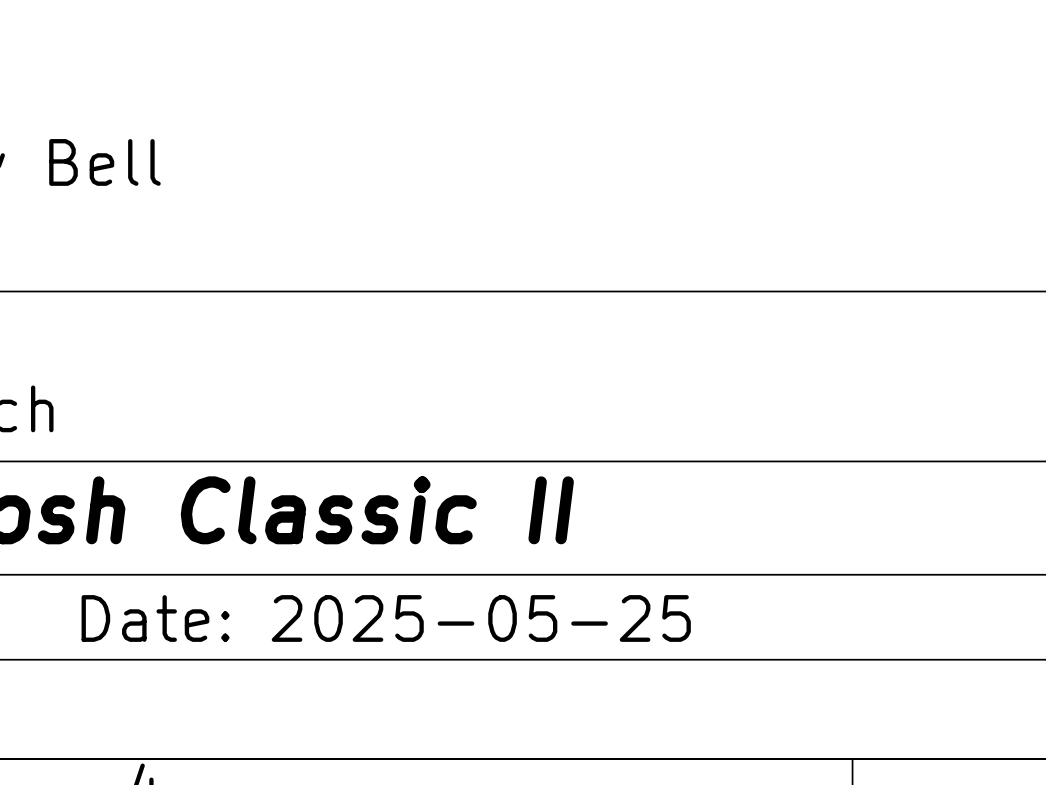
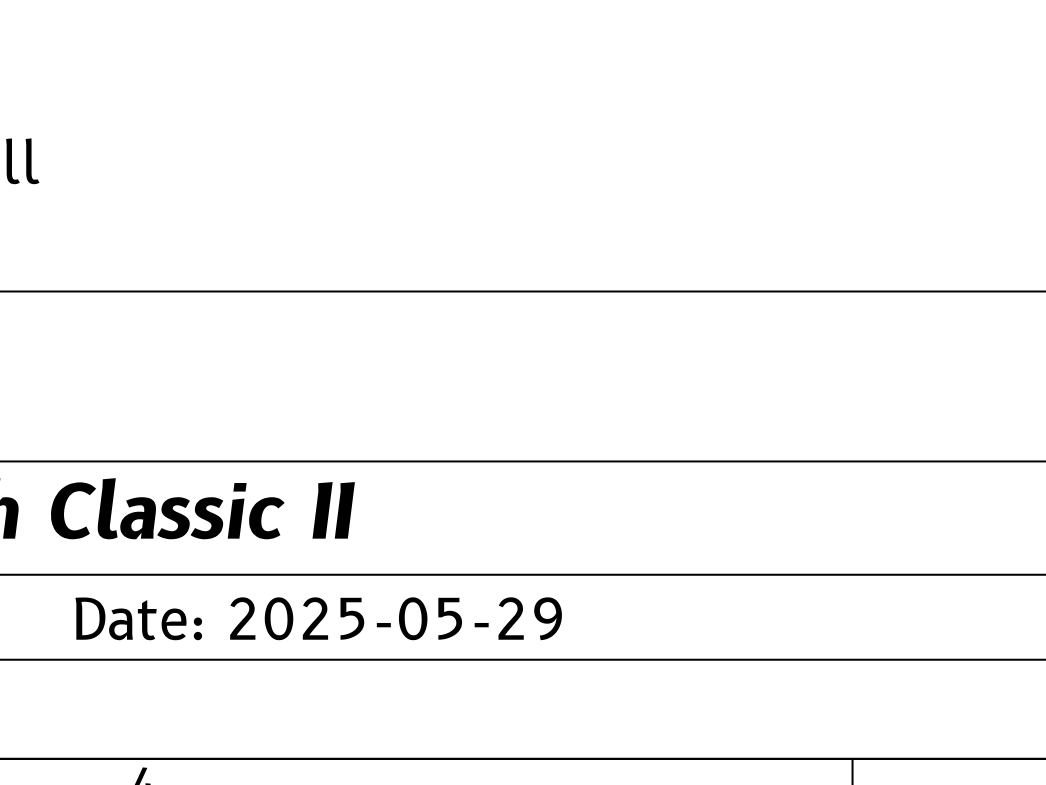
title block: Date: 2025-05-25 (386, 618) -> Date: 2025-05-29 (318, 618)

